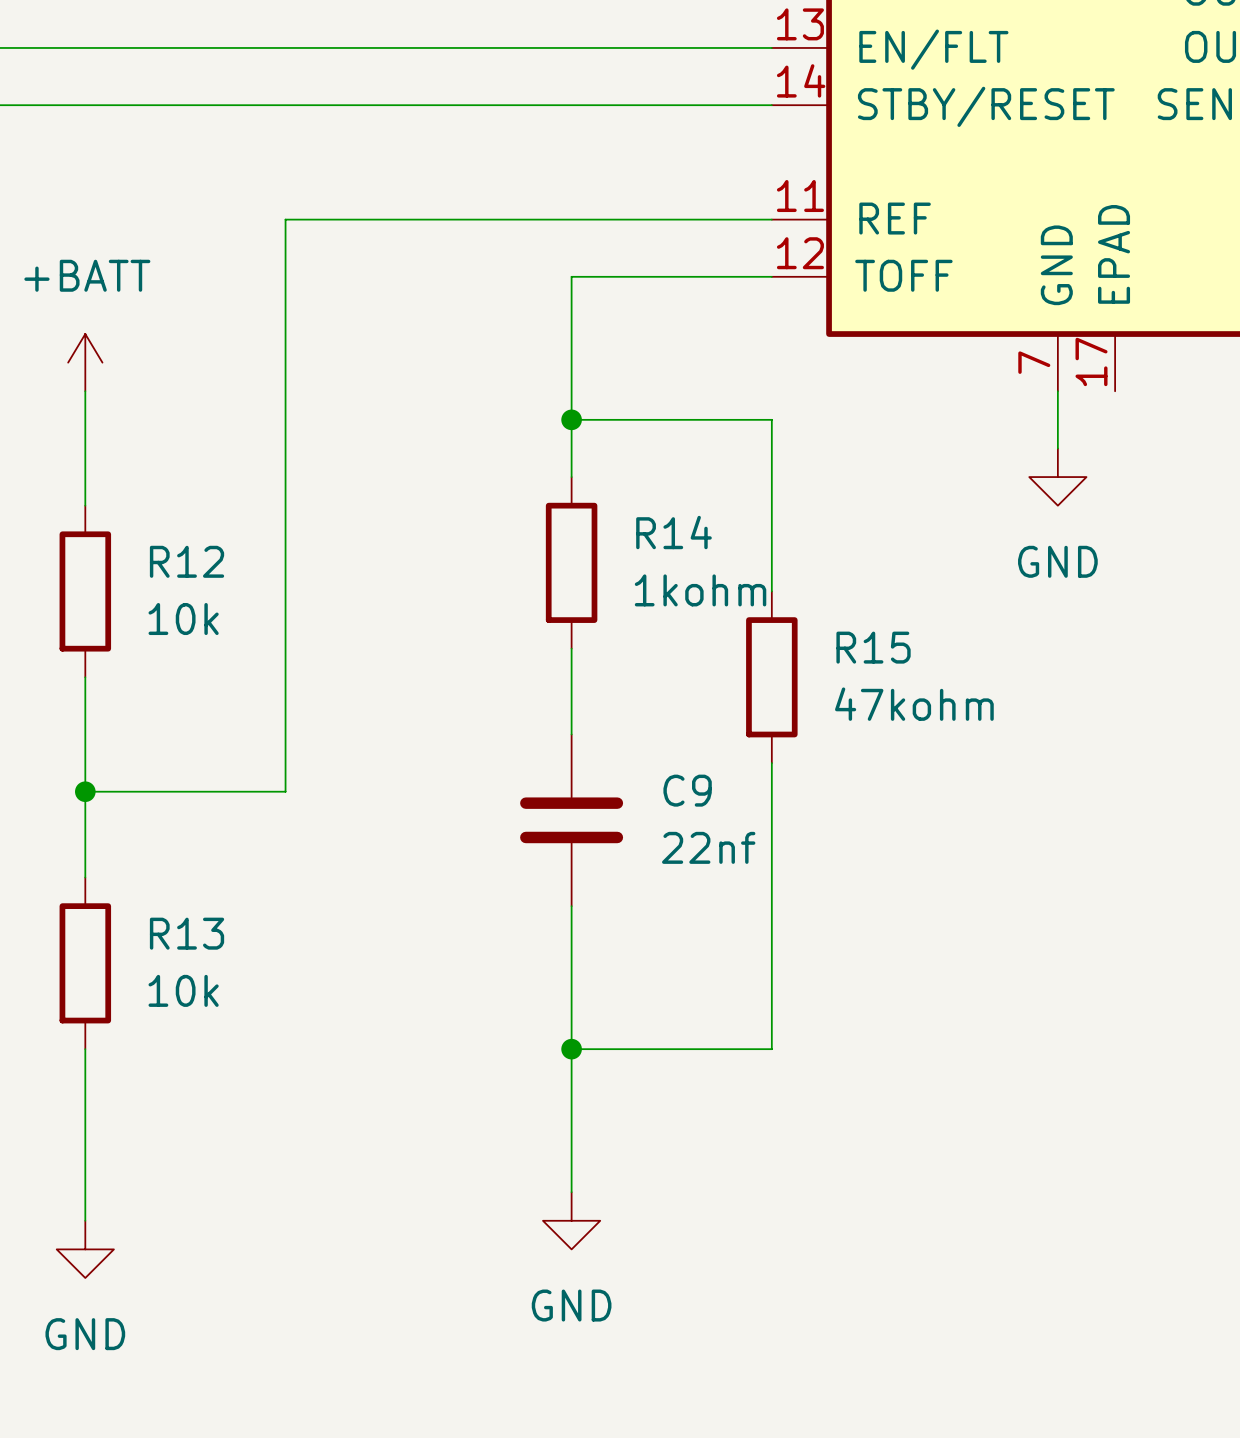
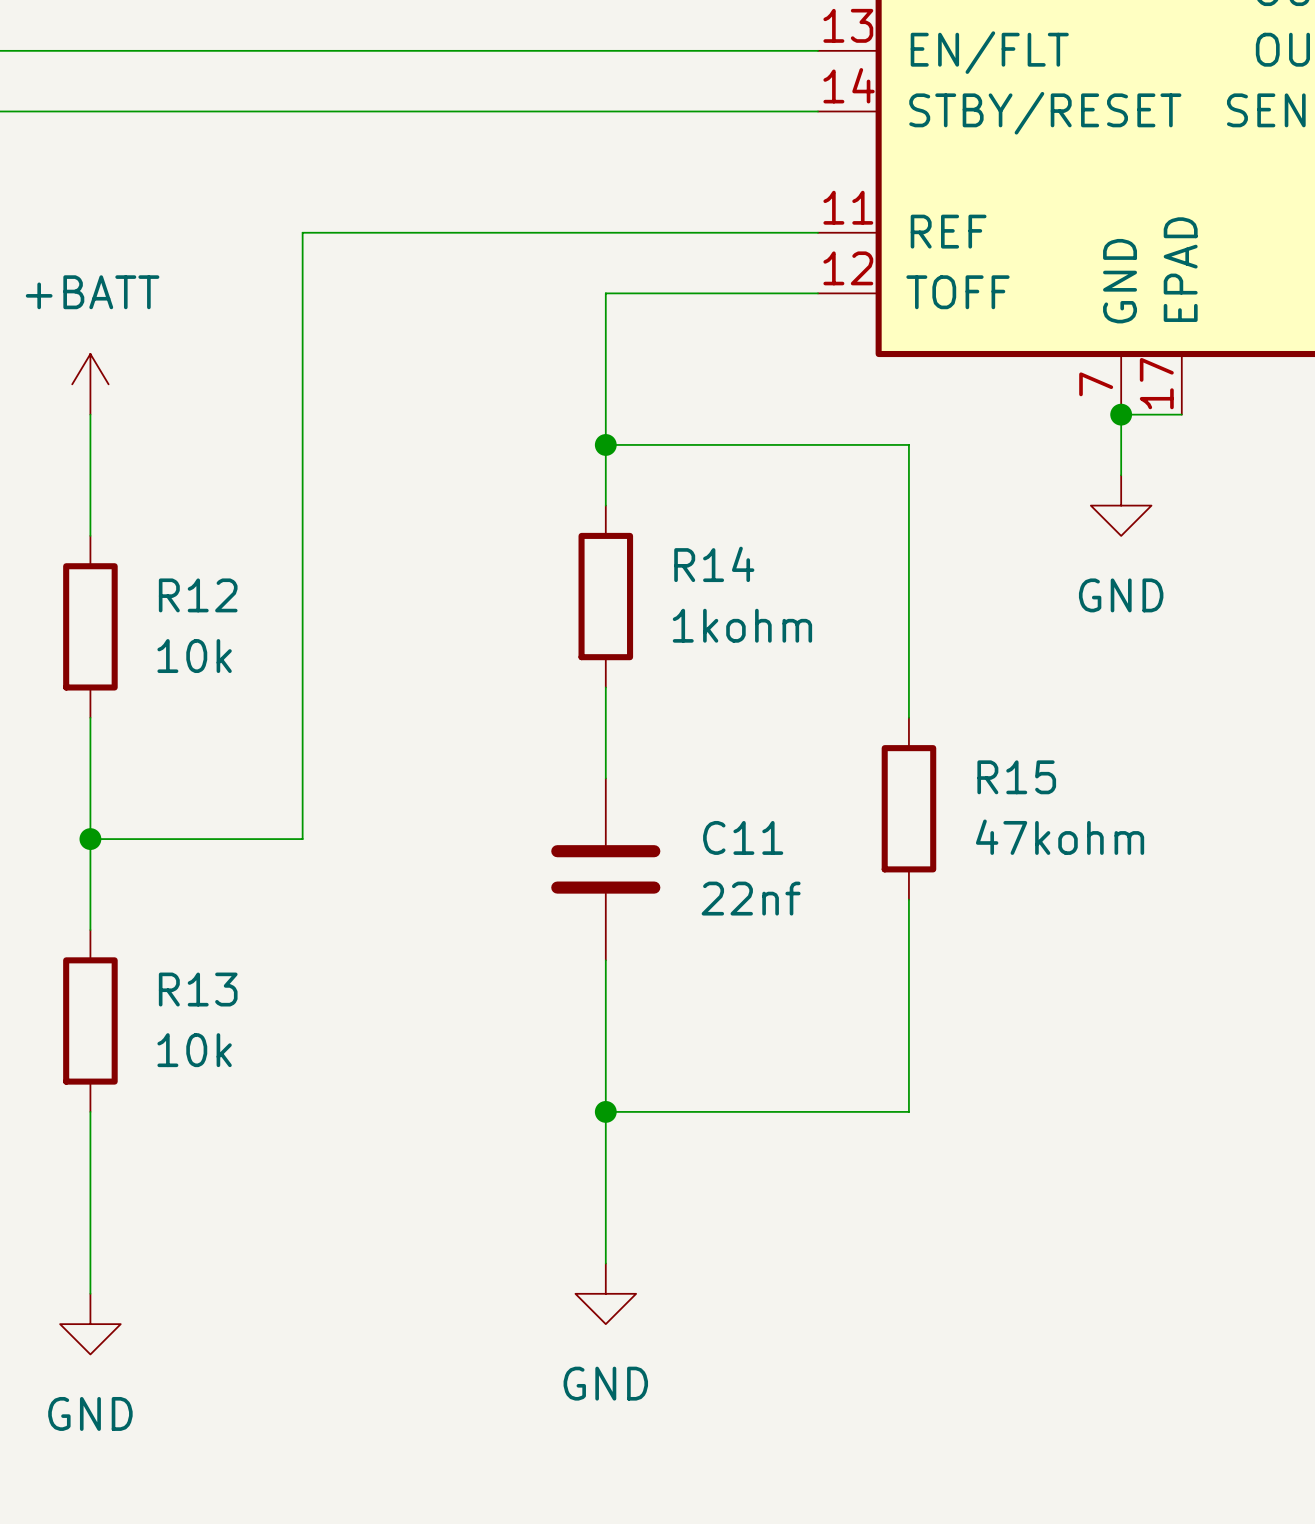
wire: none -> (1121, 414) (1181, 414)
junction: none -> (1121, 414)
wire: (771, 419) (771, 591) -> (818, 444) (908, 444) (908, 717)
R15 position: (771, 677) -> (908, 808)
wire: (771, 763) (771, 1049) -> (908, 899) (908, 1111) (818, 1111)
C9 name: C9 (687, 790) -> C11 (743, 837)

